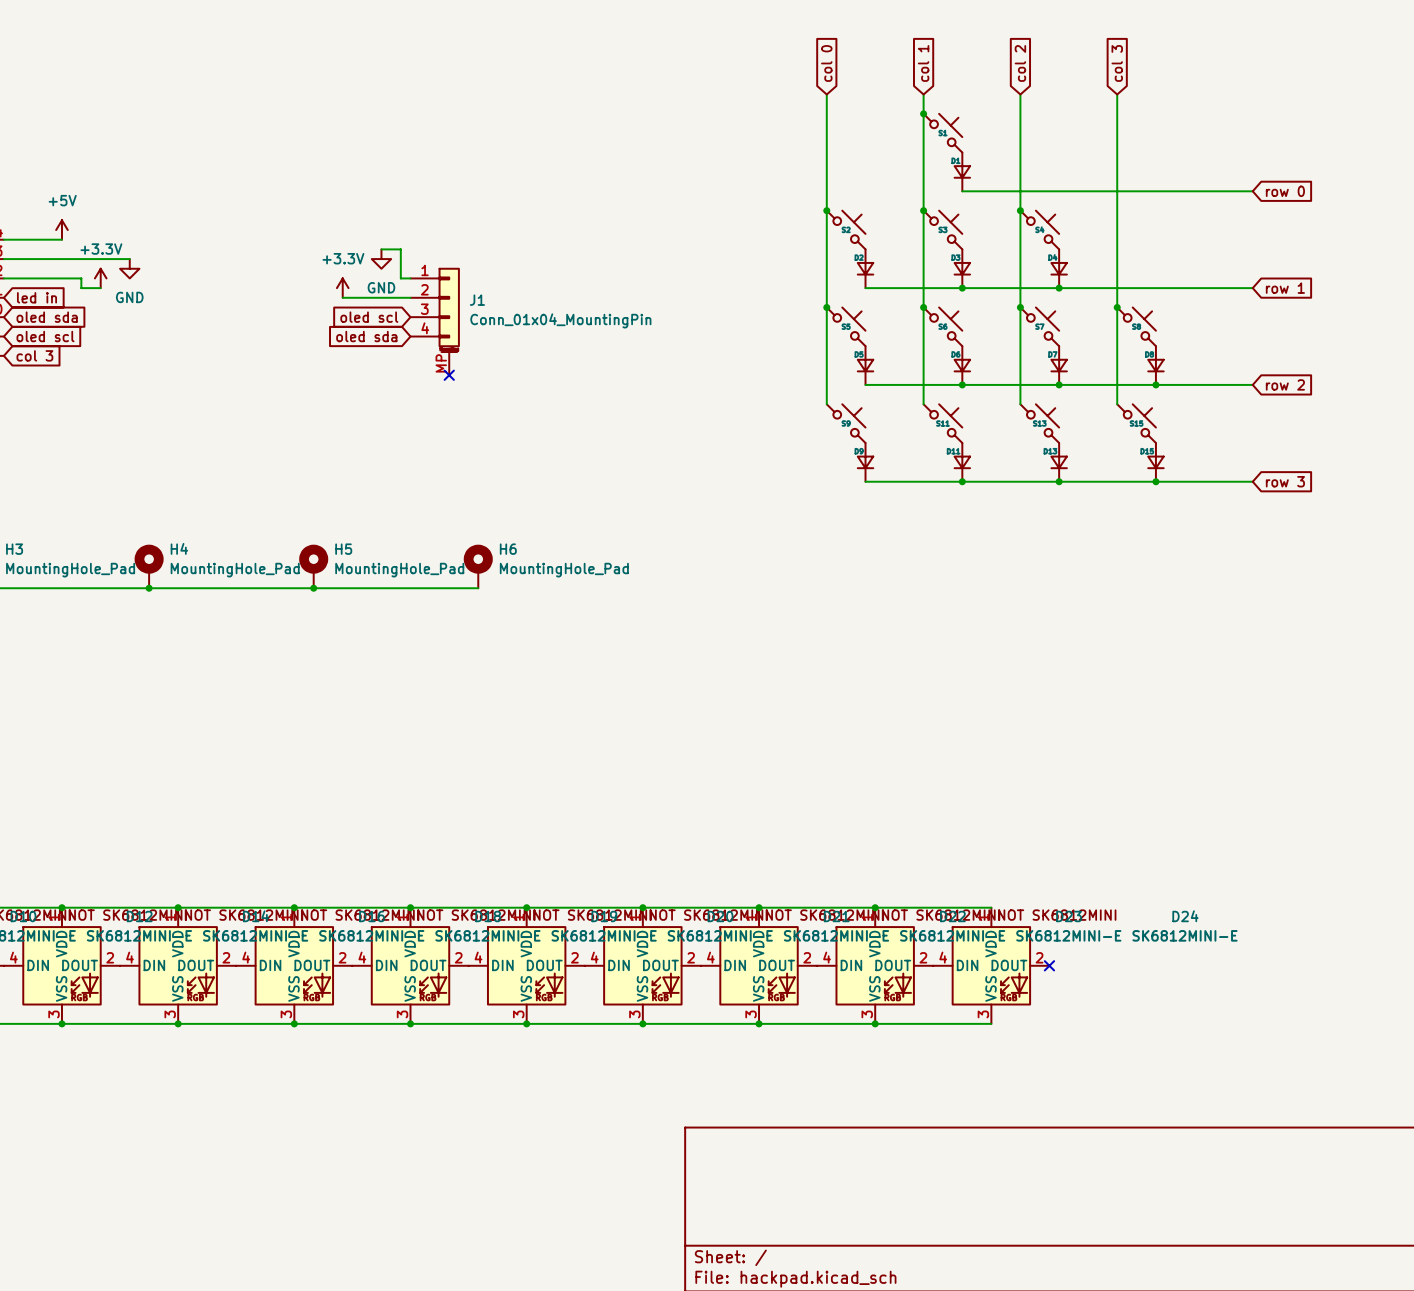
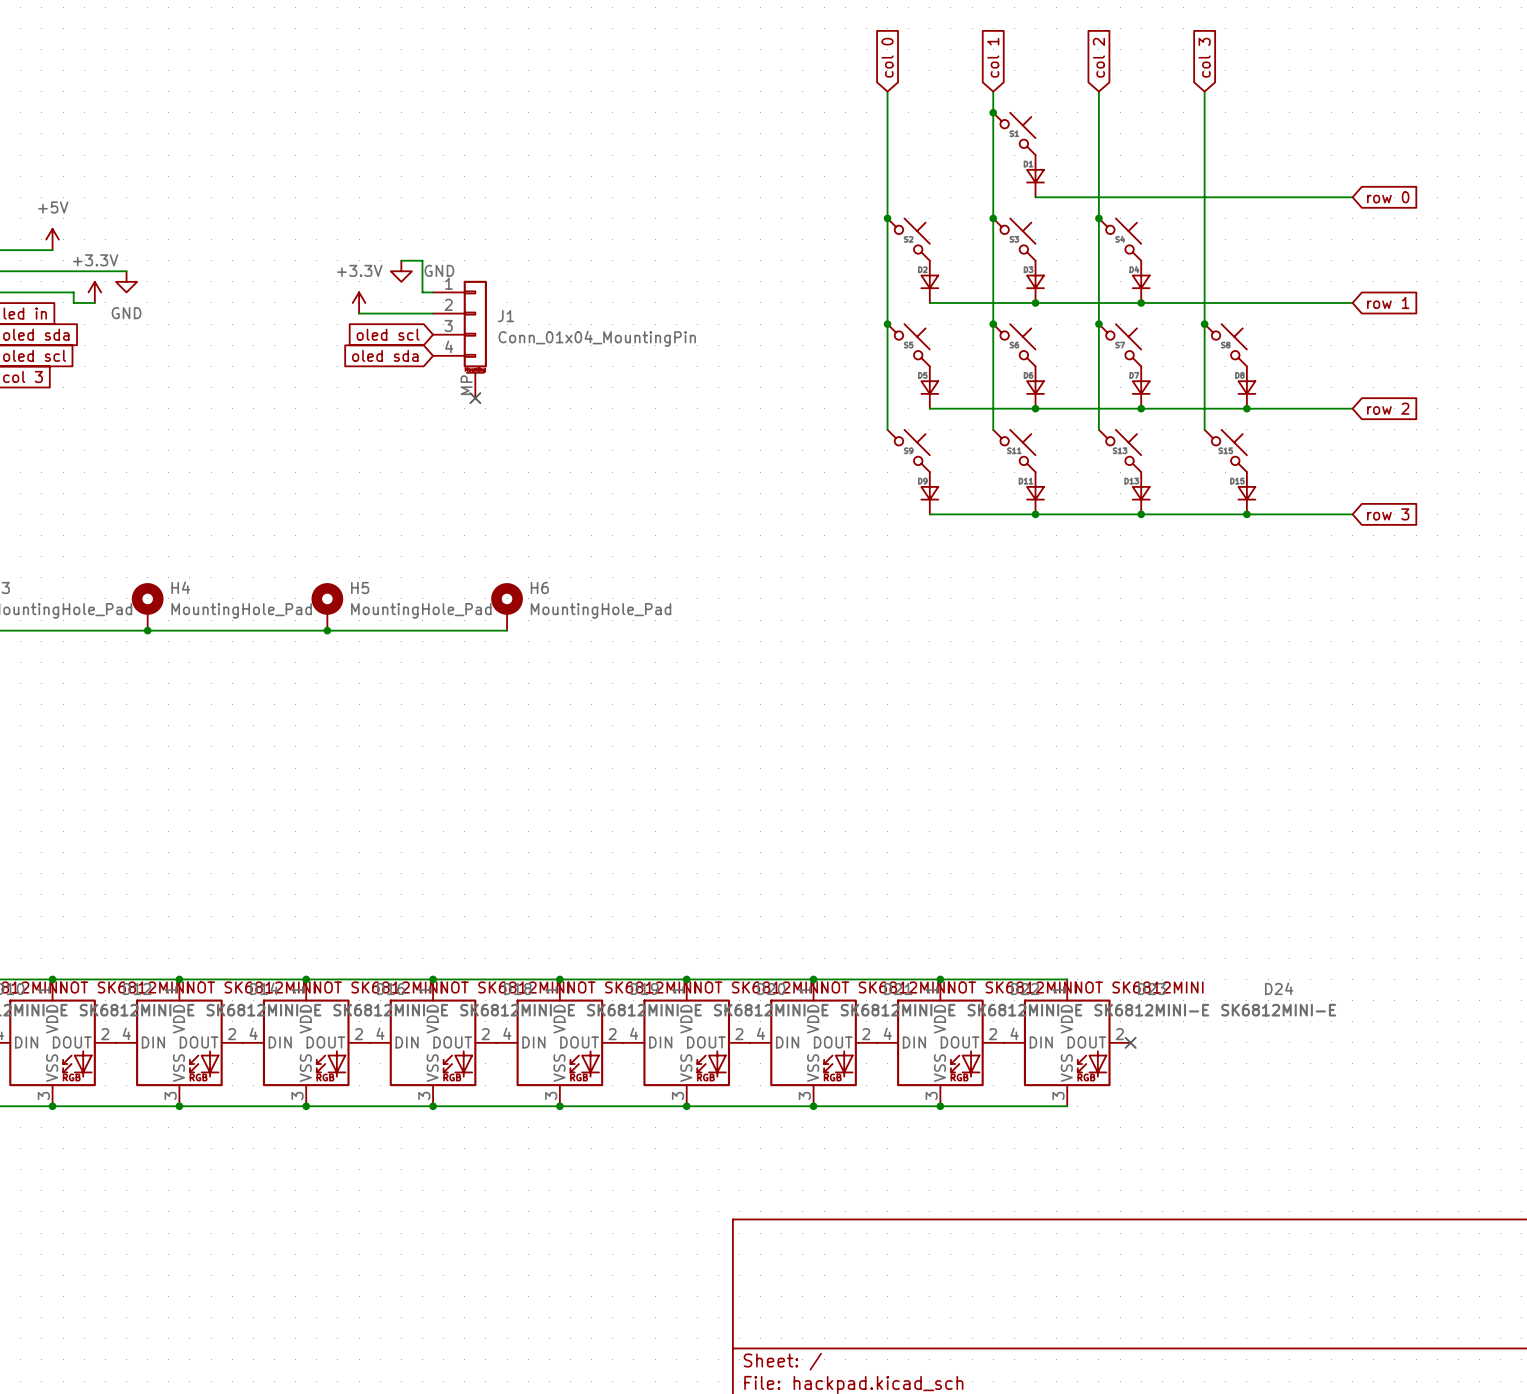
power symbol text position: GND (381, 287) -> GND (439, 270)

